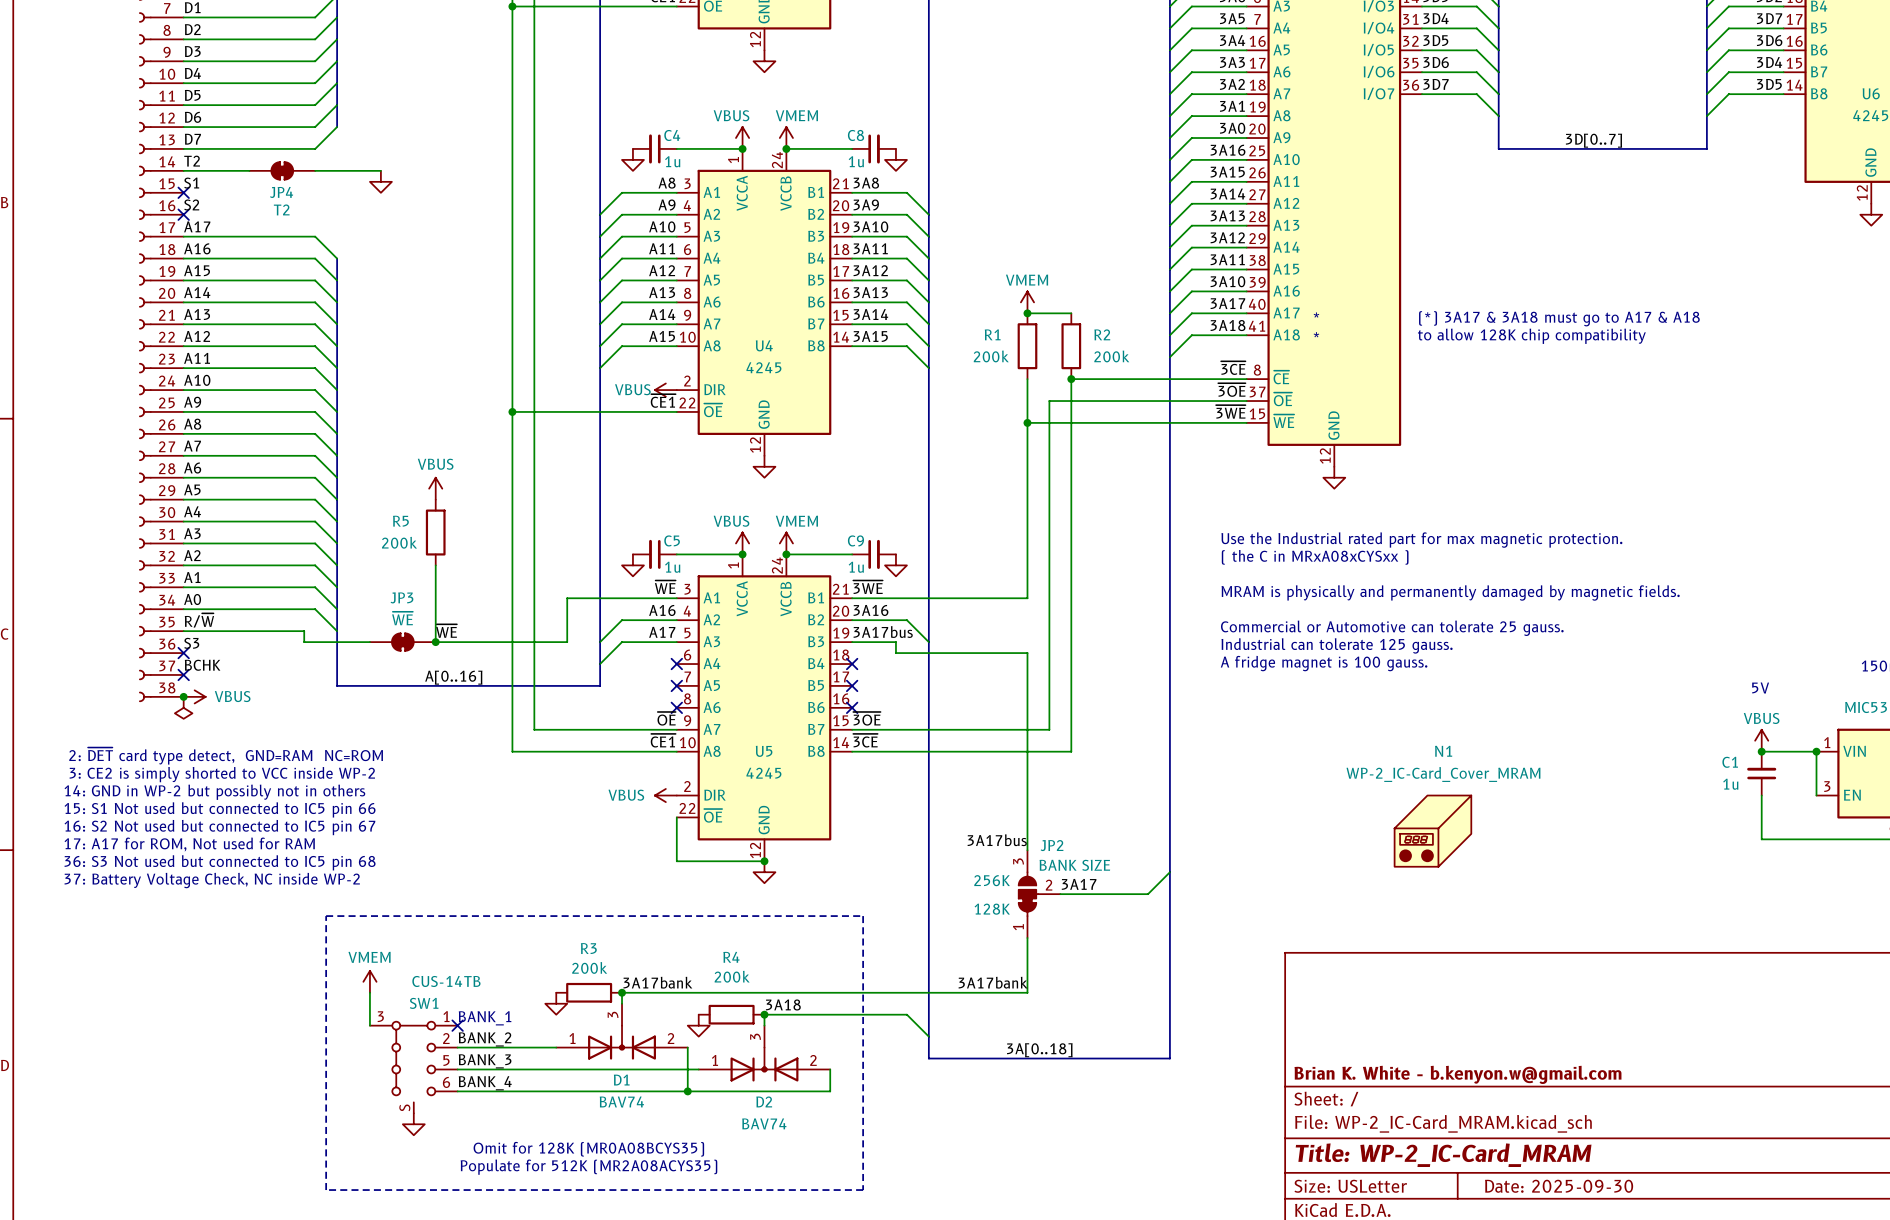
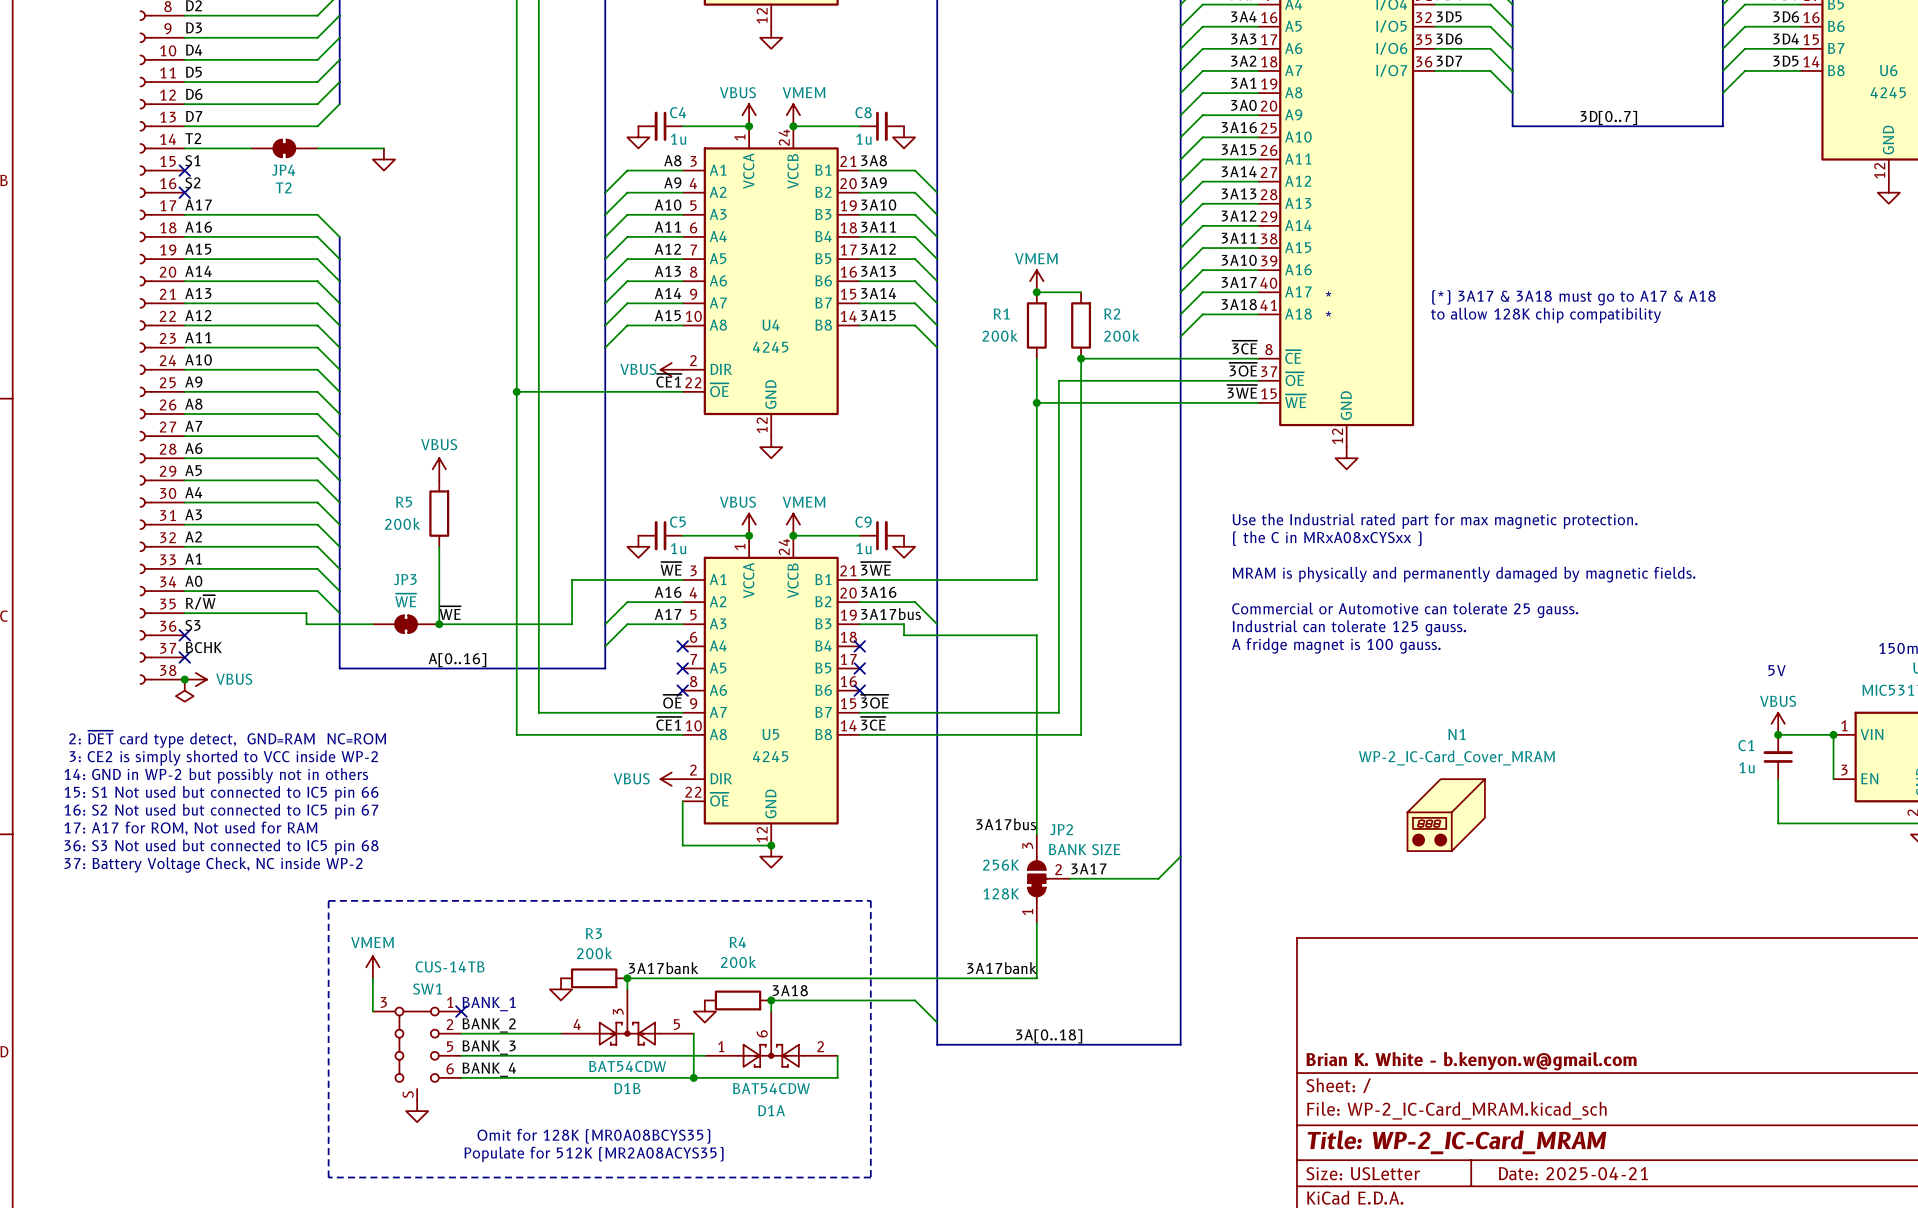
D1: BAV74 (622, 1031) -> none
D1B: none -> BAT54CDW (627, 1017)
D2: BAV74 (764, 1053) -> none
D1A: none -> BAT54CDW (771, 1039)
title block: Date: 2025-09-30 (1559, 1186) -> Date: 2025-04-21 (1573, 1173)

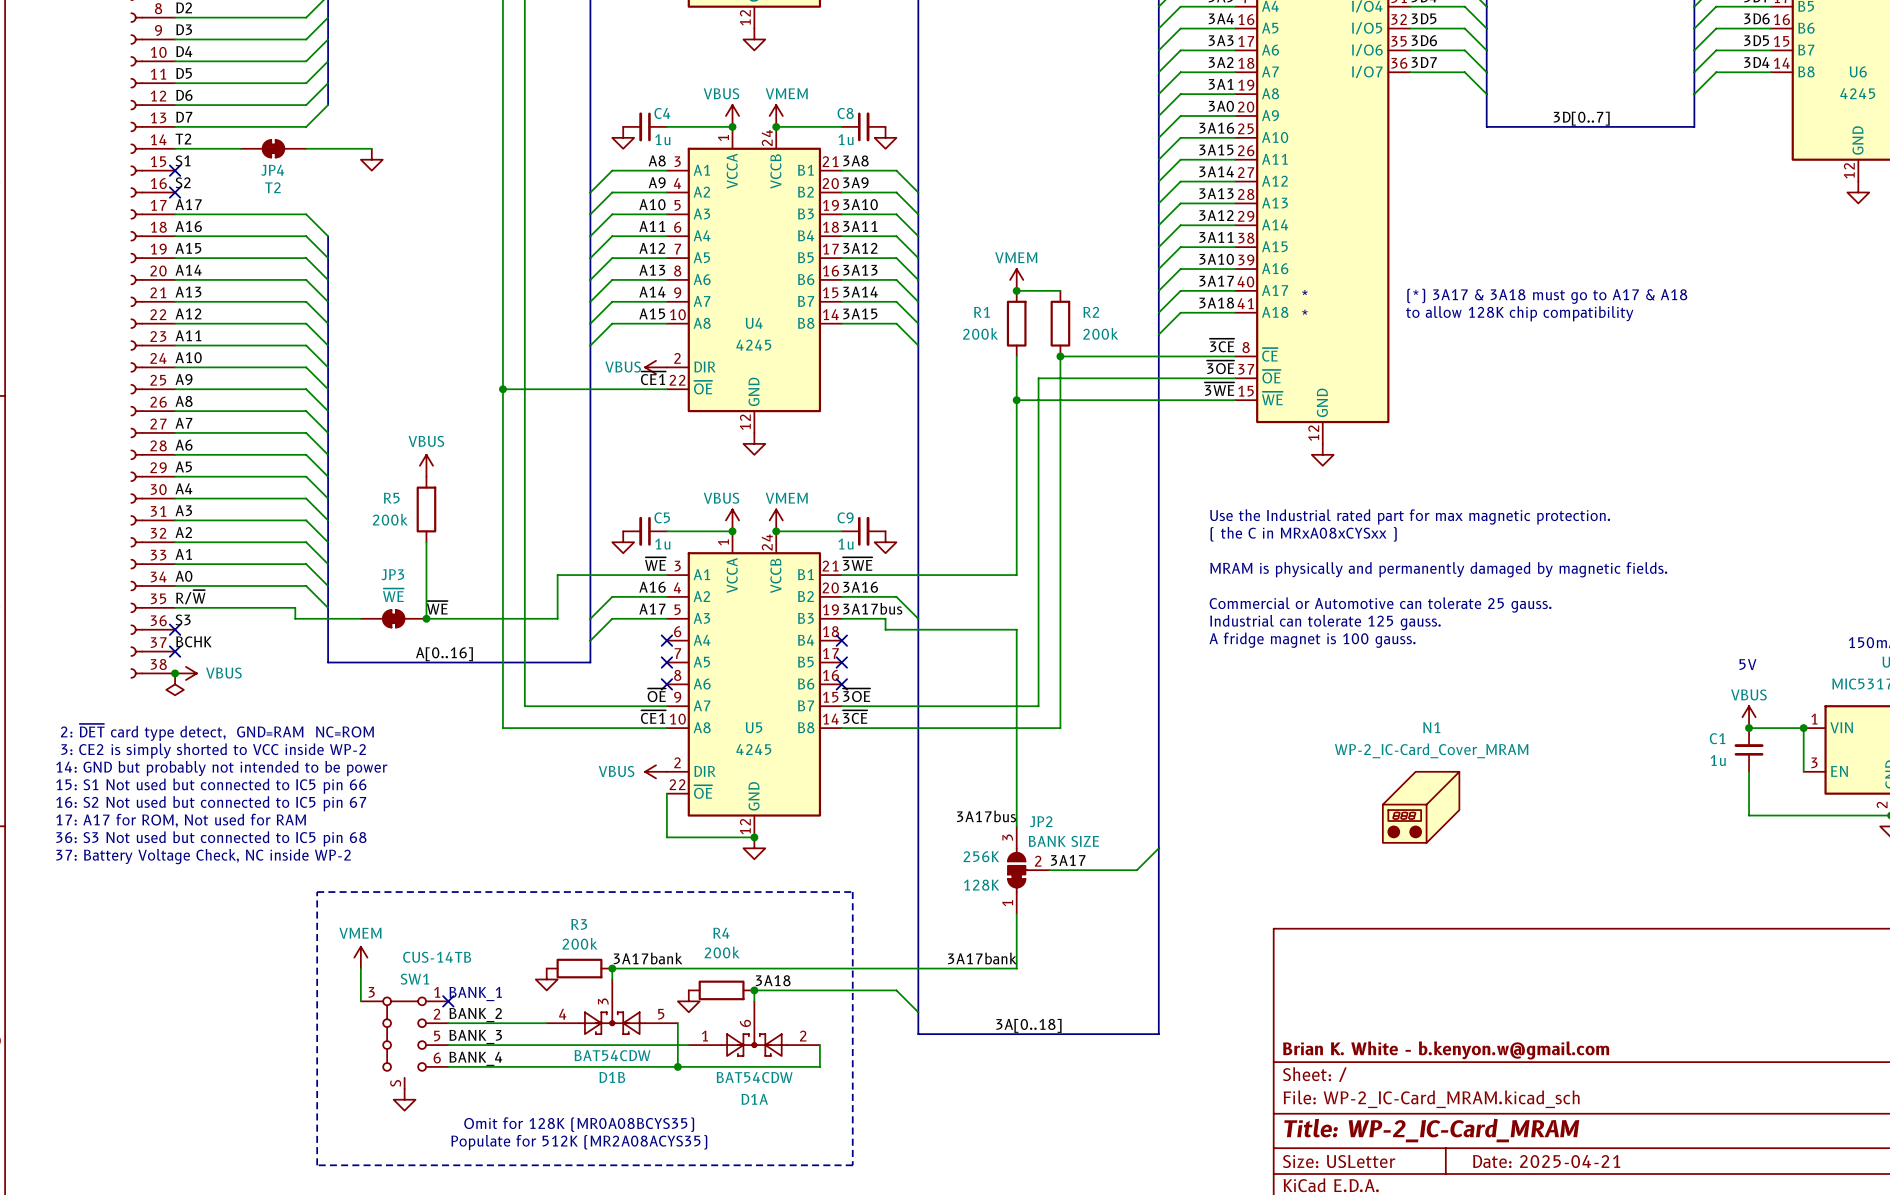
label: 3D4 (1786, 38) -> 3D5 (1756, 40)
label: 3D5 (1785, 61) -> 3D4 (1756, 62)
text: 14: GND in WP-2 but possibly not in others (216, 775) -> 14: GND but probably not intended to be power (221, 768)

